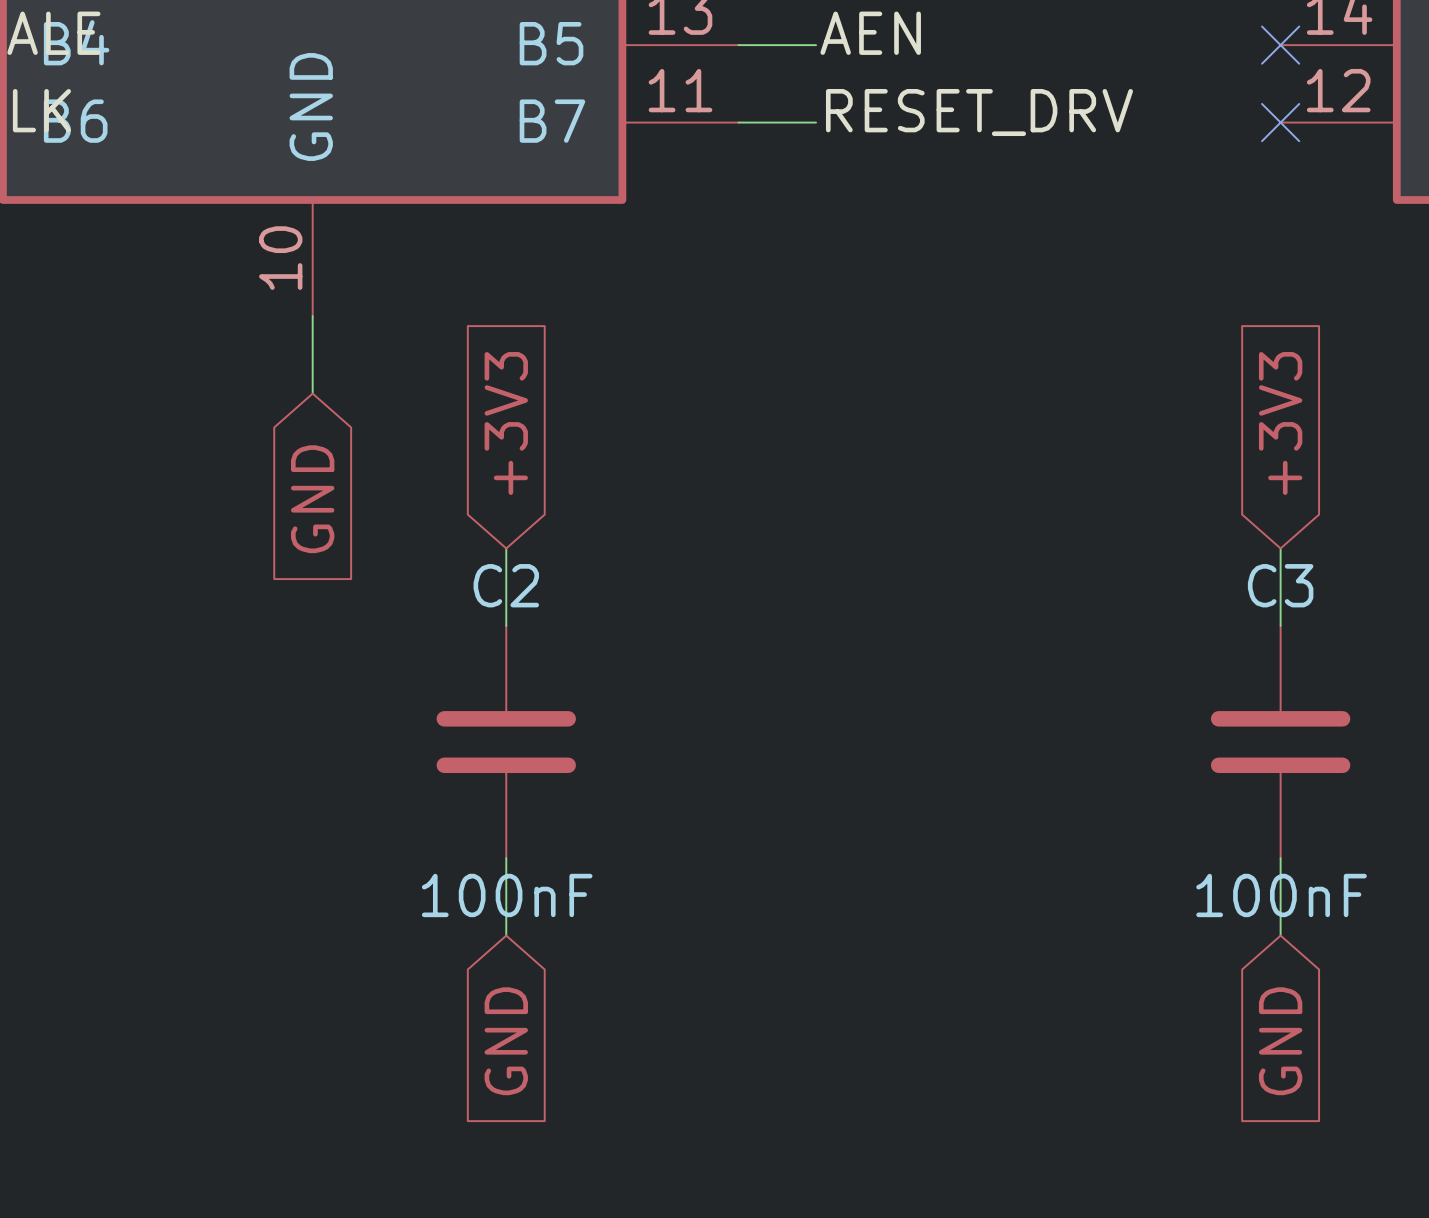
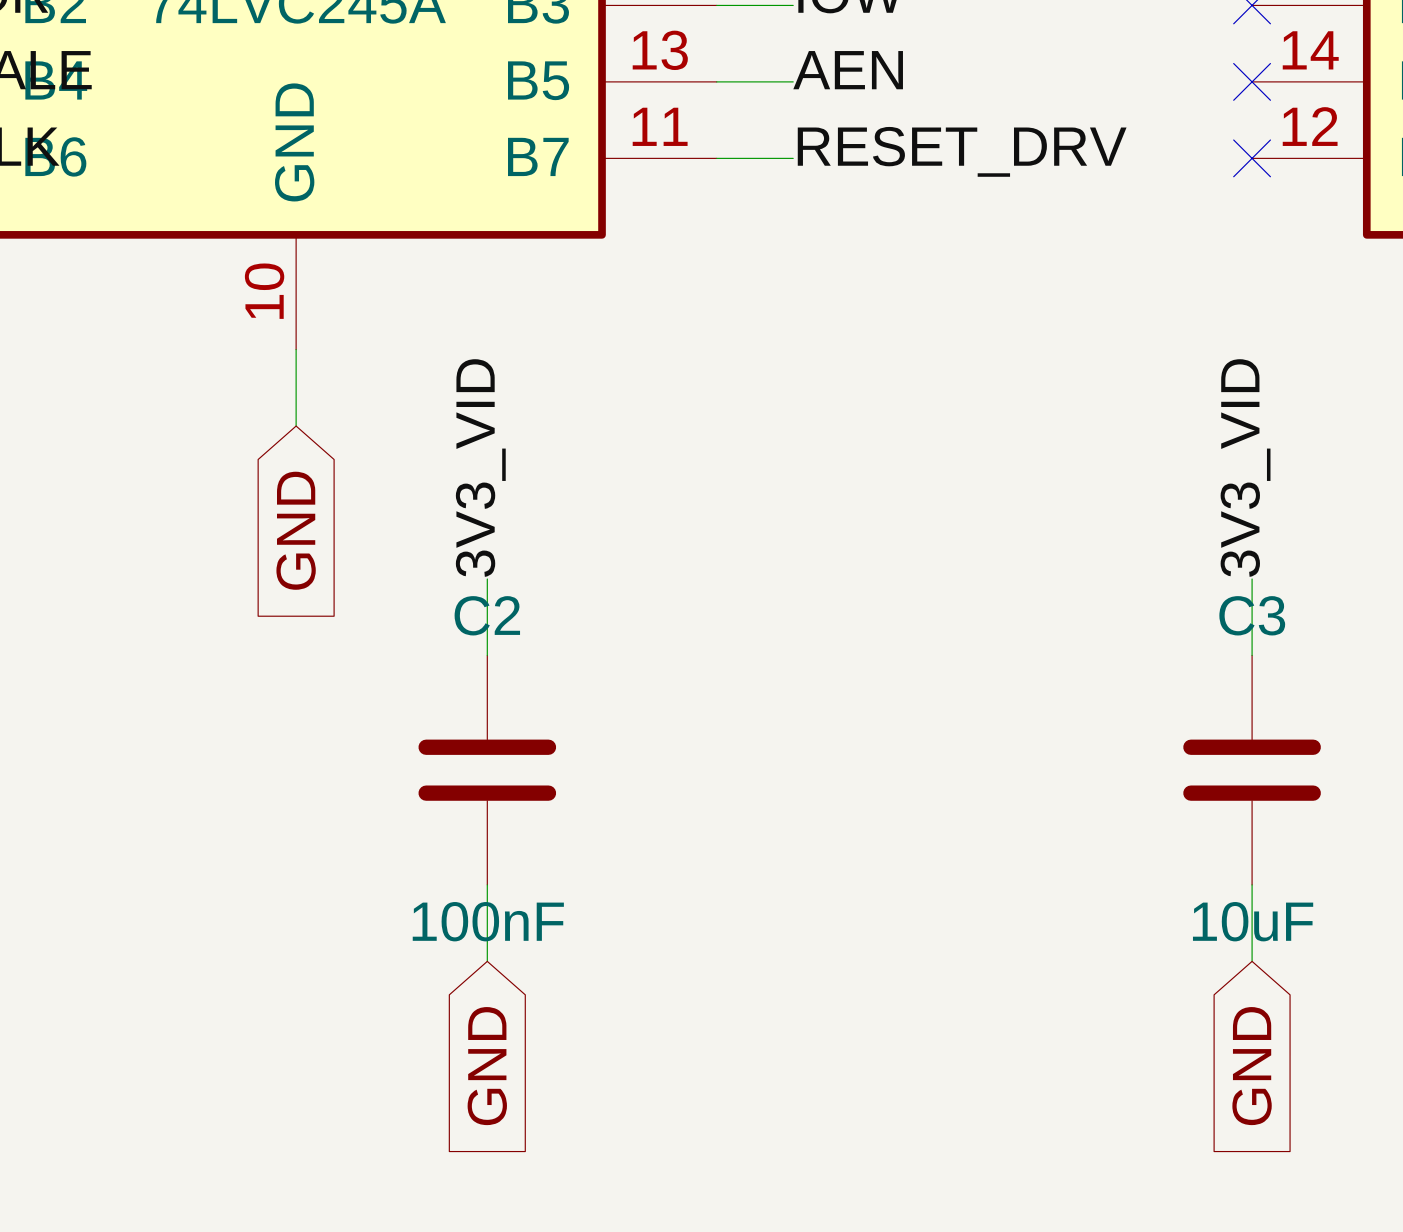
global label: +3V3 (506, 423) -> none
global label: +3V3 (1280, 423) -> none
label: none -> 3V3_VID (480, 468)
label: none -> 3V3_VID (1245, 468)
C3 value: 100nF (1281, 895) -> 10uF (1253, 921)

